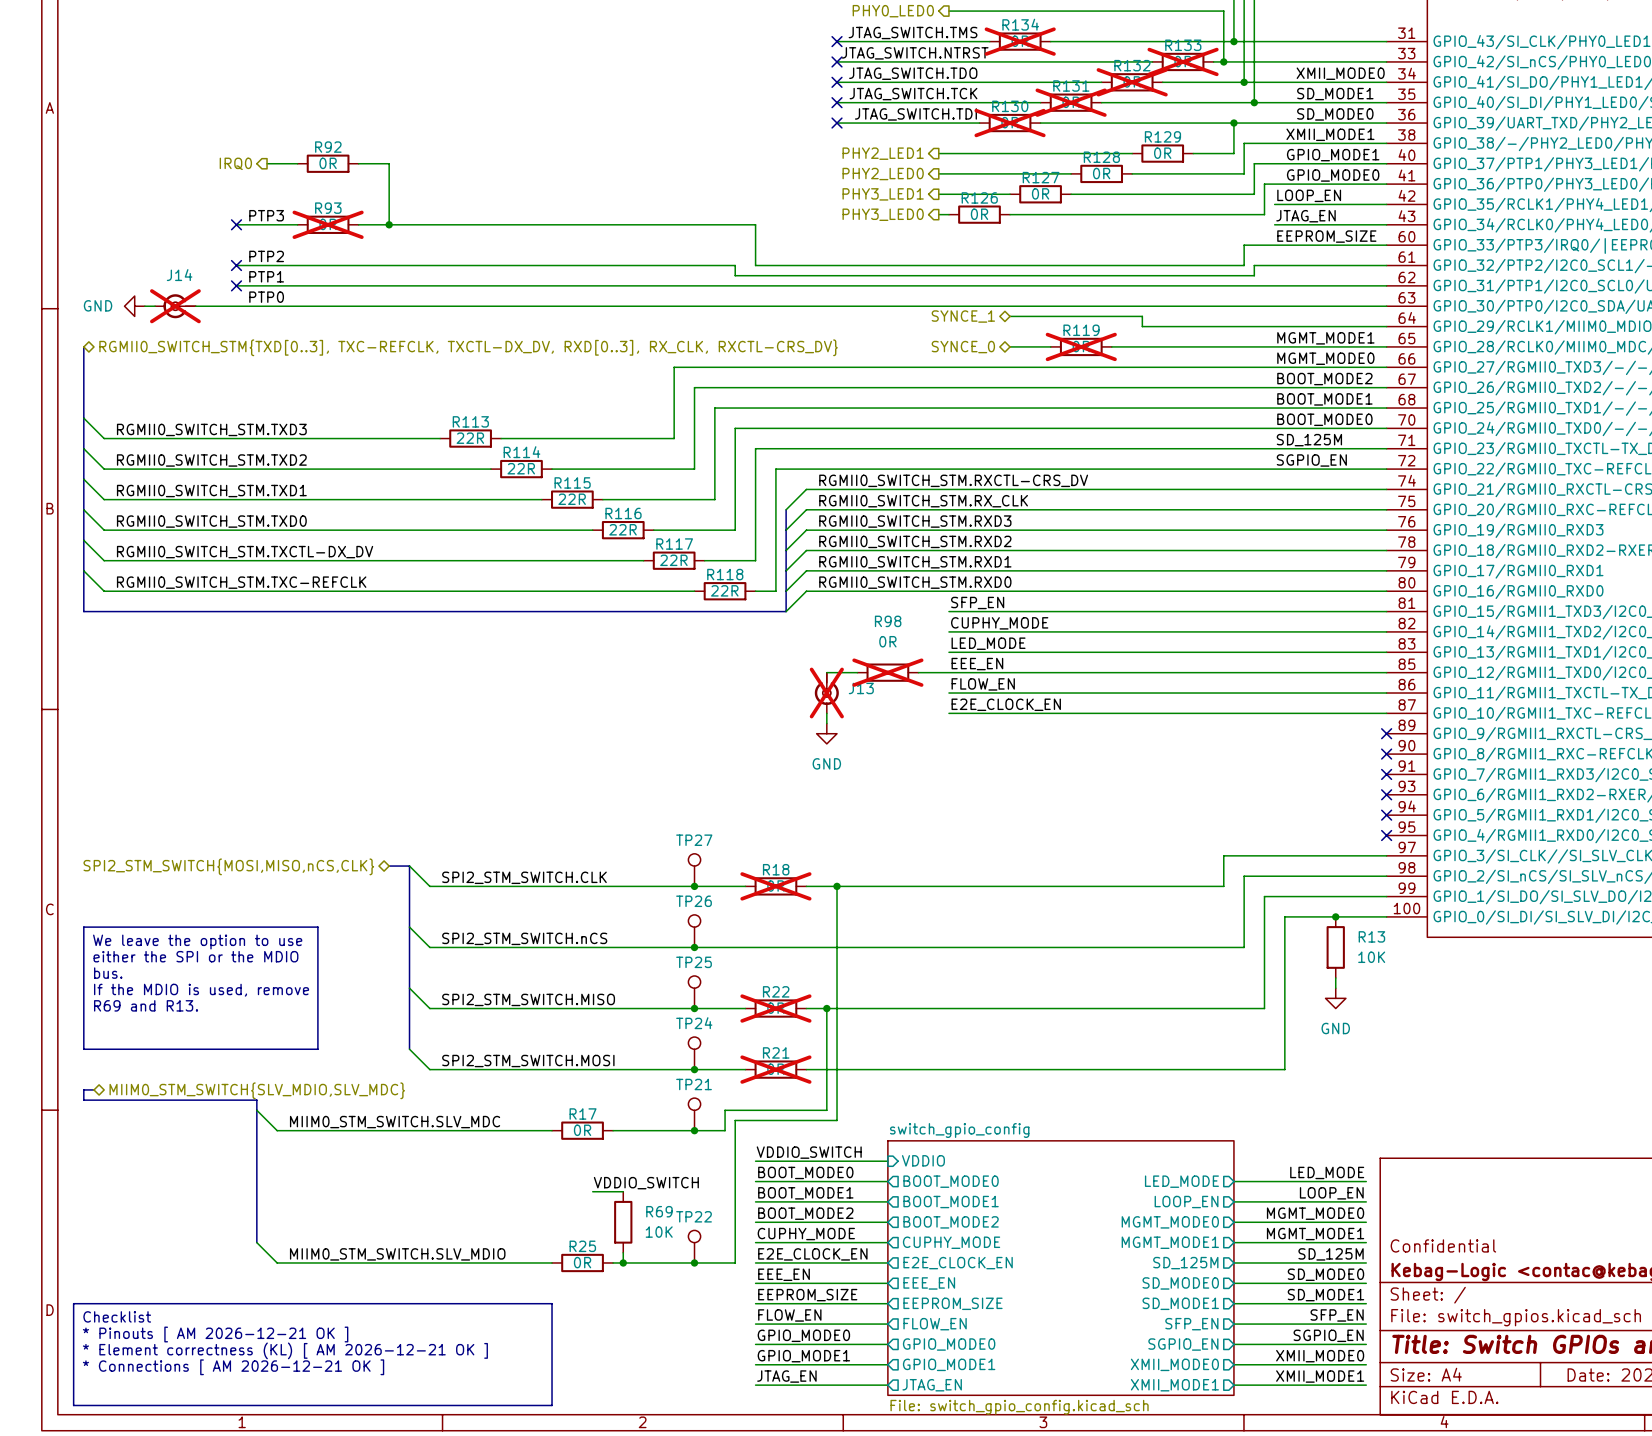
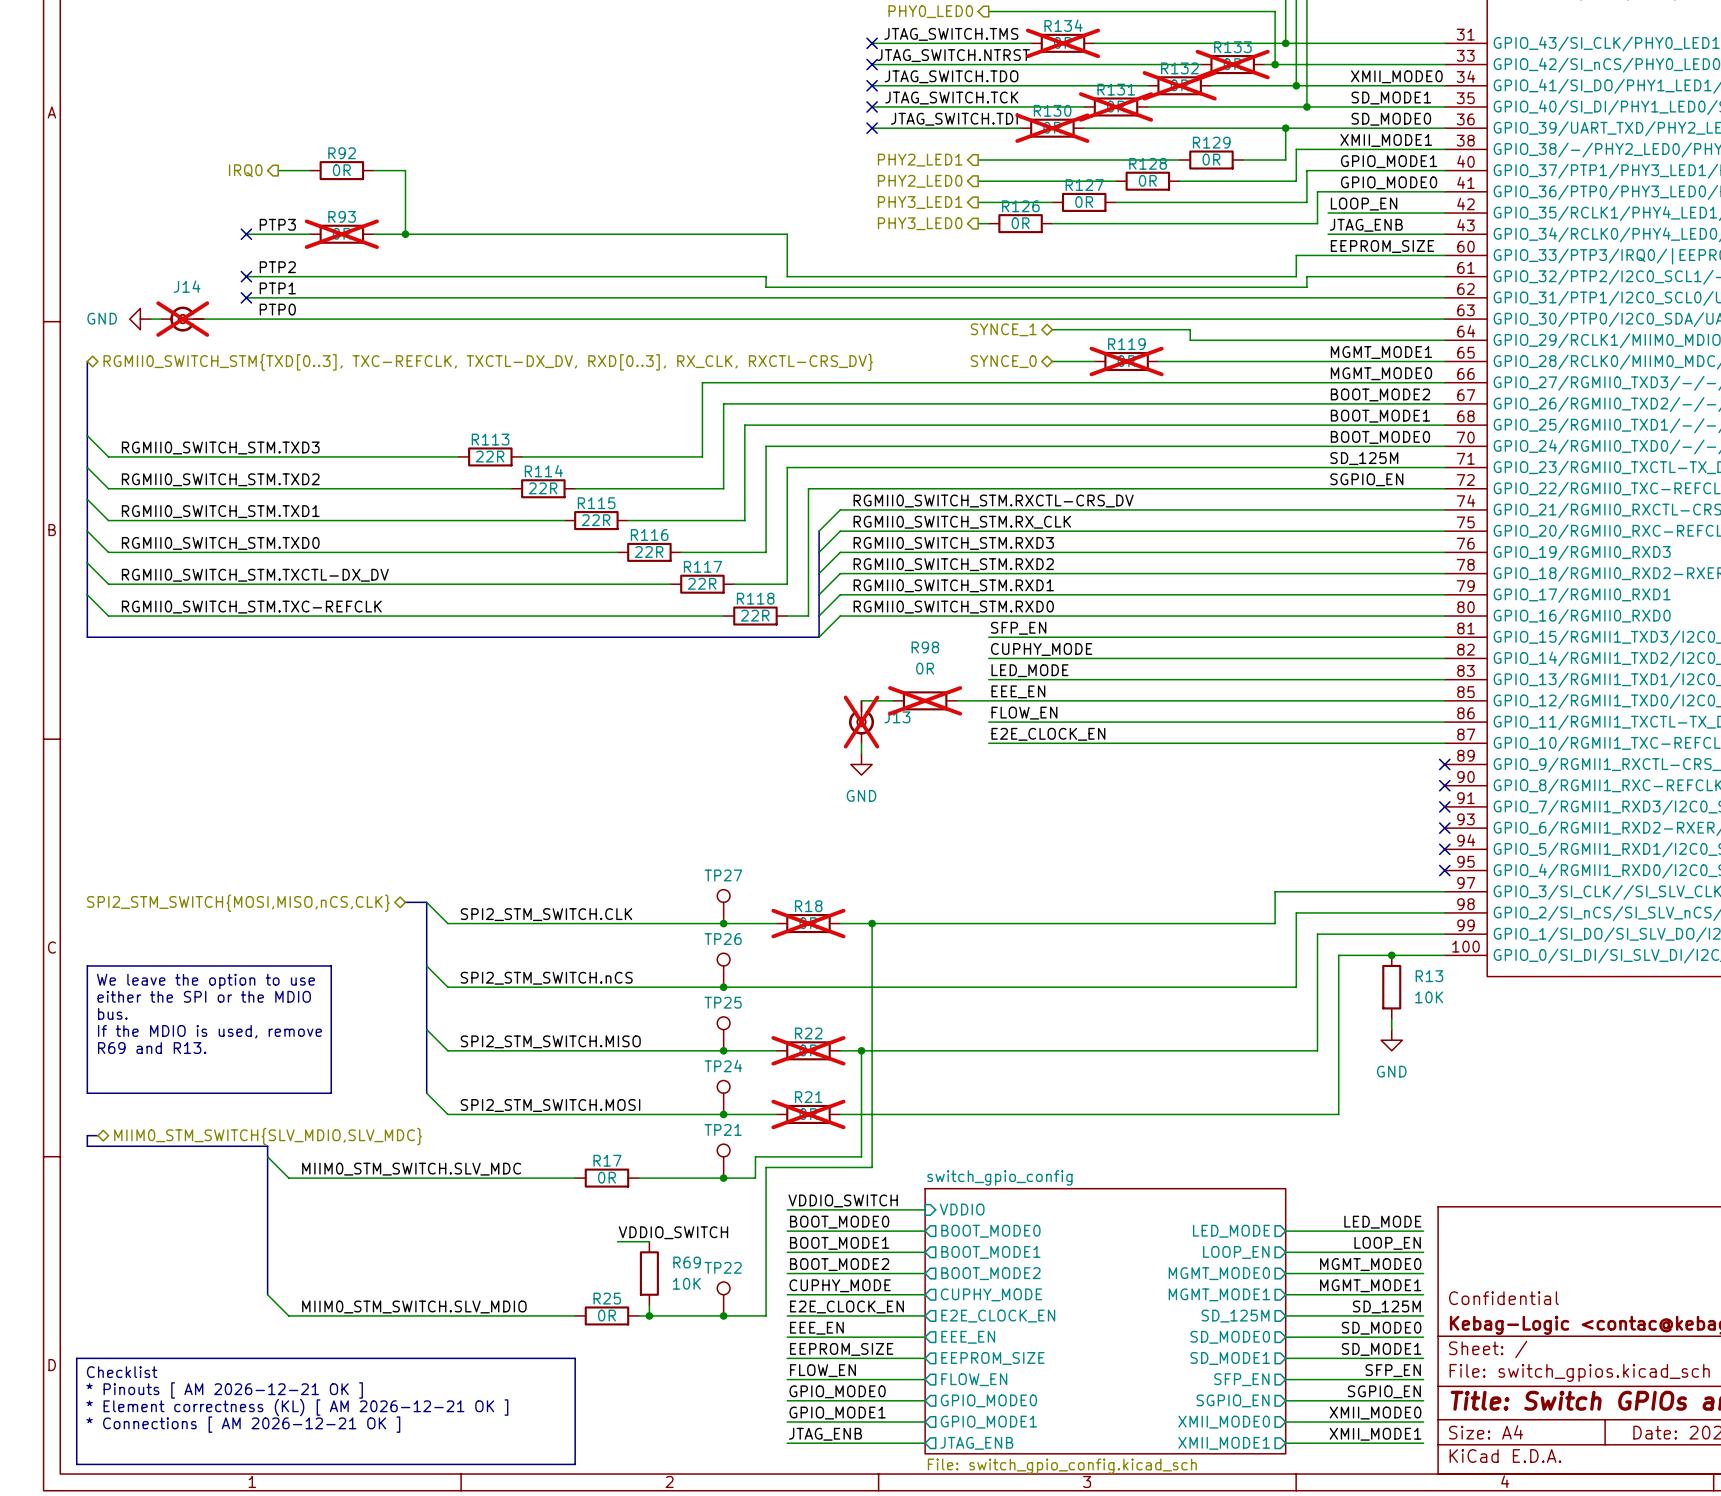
label: JTAG_EN (1306, 216) -> JTAG_ENB (1366, 225)
label: JTAG_EN (786, 1376) -> JTAG_ENB (825, 1434)
sheet pin: JTAG_EN (932, 1385) -> JTAG_ENB (976, 1443)

